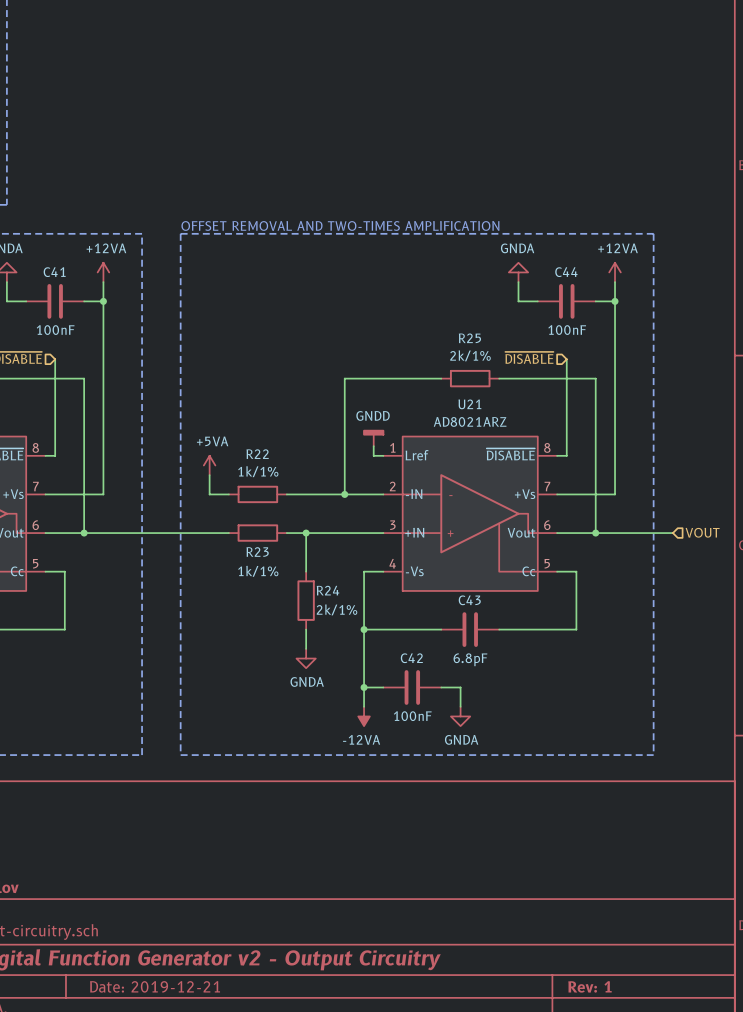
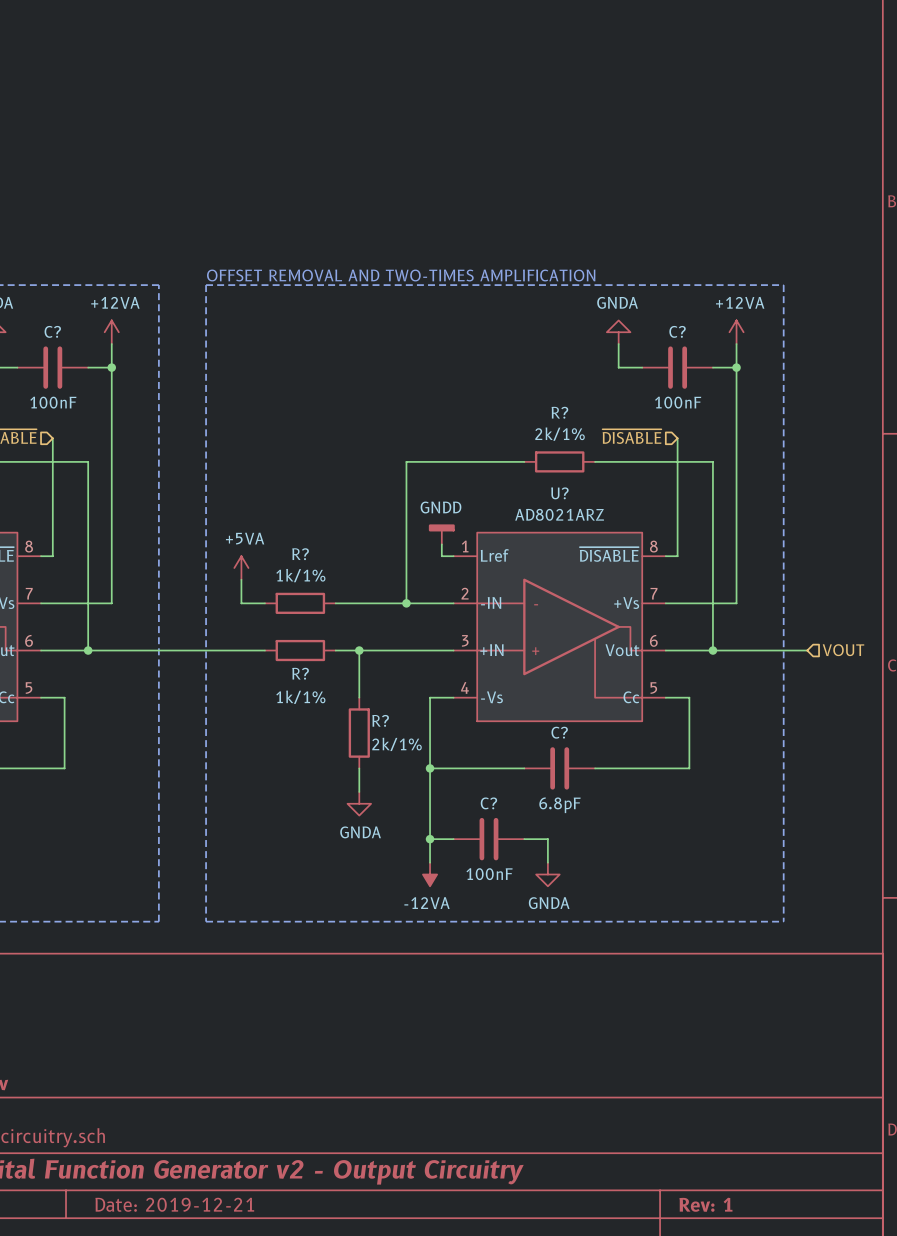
C41 name: C41 (54, 272) -> C? (52, 331)
C44 name: C44 (566, 272) -> C? (677, 331)
R25 name: R25 (469, 338) -> R? (559, 412)
U21 name: U21 (469, 404) -> U? (559, 493)
R22 name: R22 (257, 454) -> R? (300, 554)
R23 name: R23 (257, 552) -> R? (300, 673)
R24 name: R24 (328, 590) -> R? (380, 720)
C43 name: C43 (469, 600) -> C? (559, 732)
C42 name: C42 (411, 658) -> C? (488, 803)

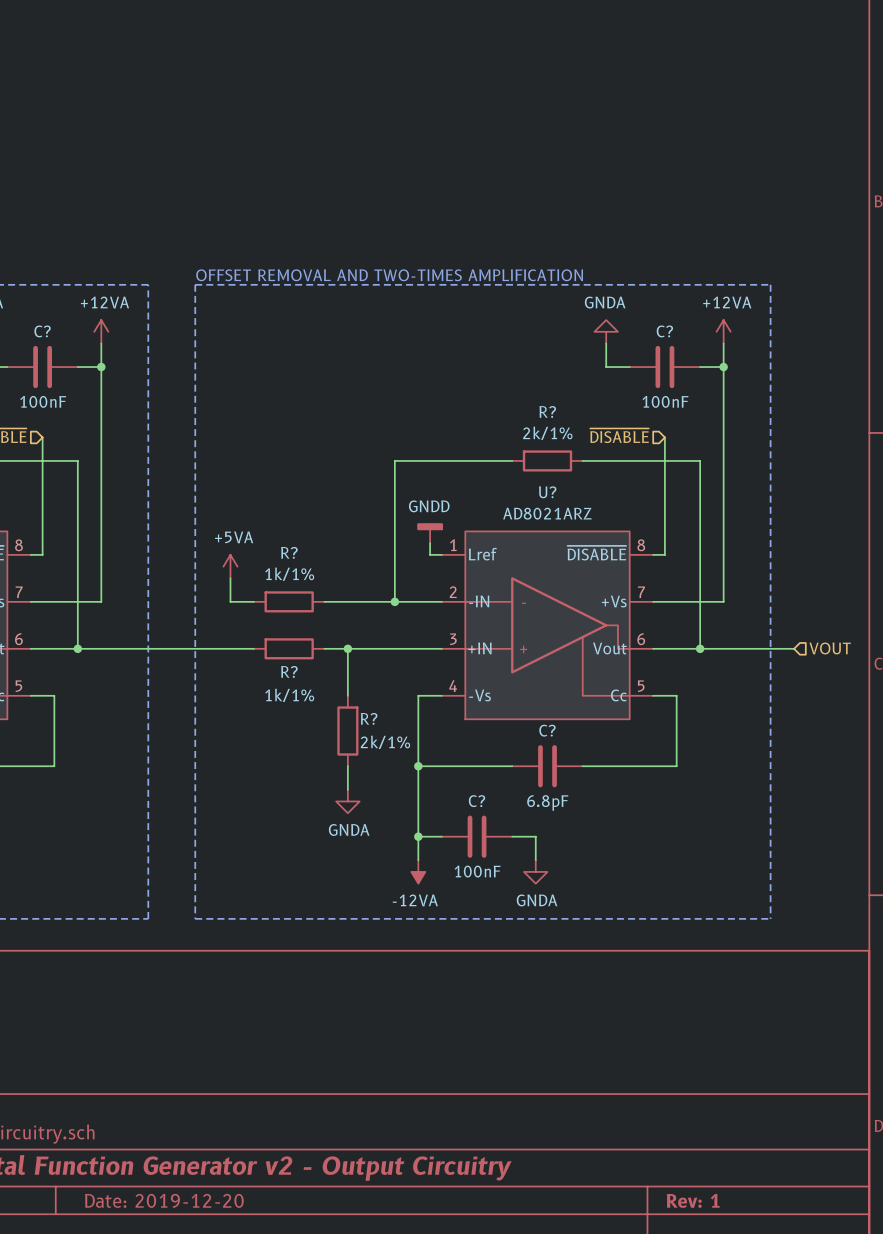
title block: Date: 2019-12-21 (174, 1204) -> Date: 2019-12-20 (164, 1200)

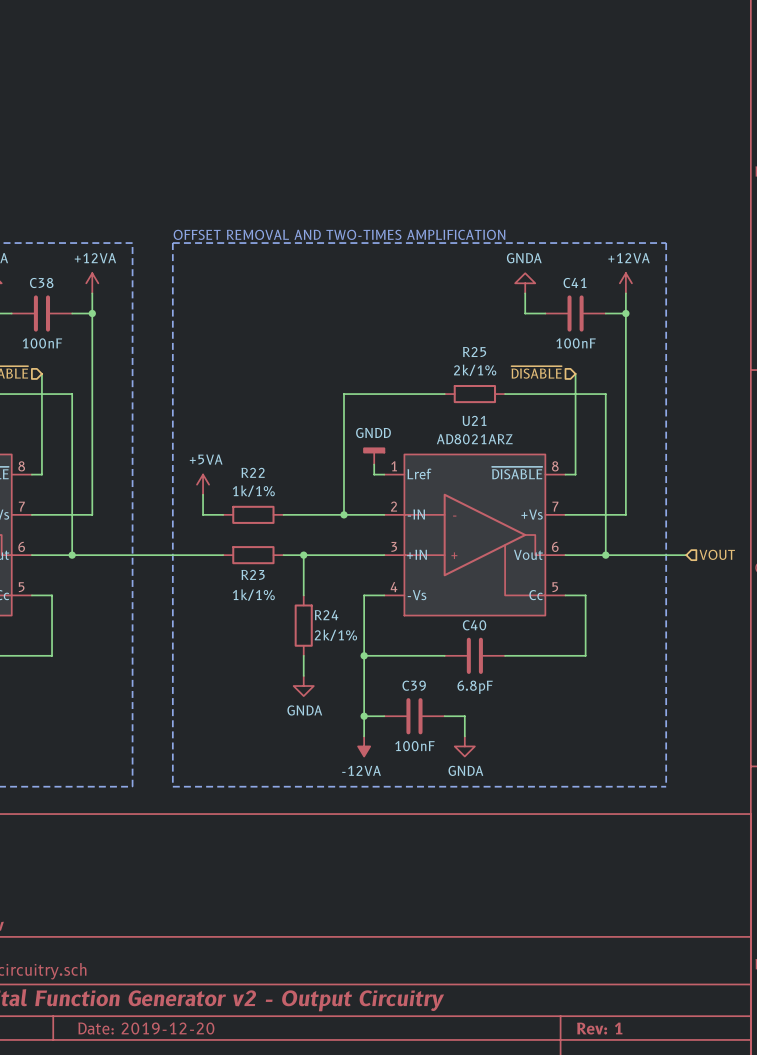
C? name: C? (42, 331) -> C38 (41, 283)
C? name: C? (664, 331) -> C41 (575, 282)
R? name: R? (547, 411) -> R25 (474, 352)
U? name: U? (547, 492) -> U21 (474, 420)
R? name: R? (289, 552) -> R22 (253, 472)
R? name: R? (289, 671) -> R23 (253, 574)
R? name: R? (369, 718) -> R24 (326, 615)
C? name: C? (547, 730) -> C40 (474, 625)
C? name: C? (477, 801) -> C39 (414, 685)

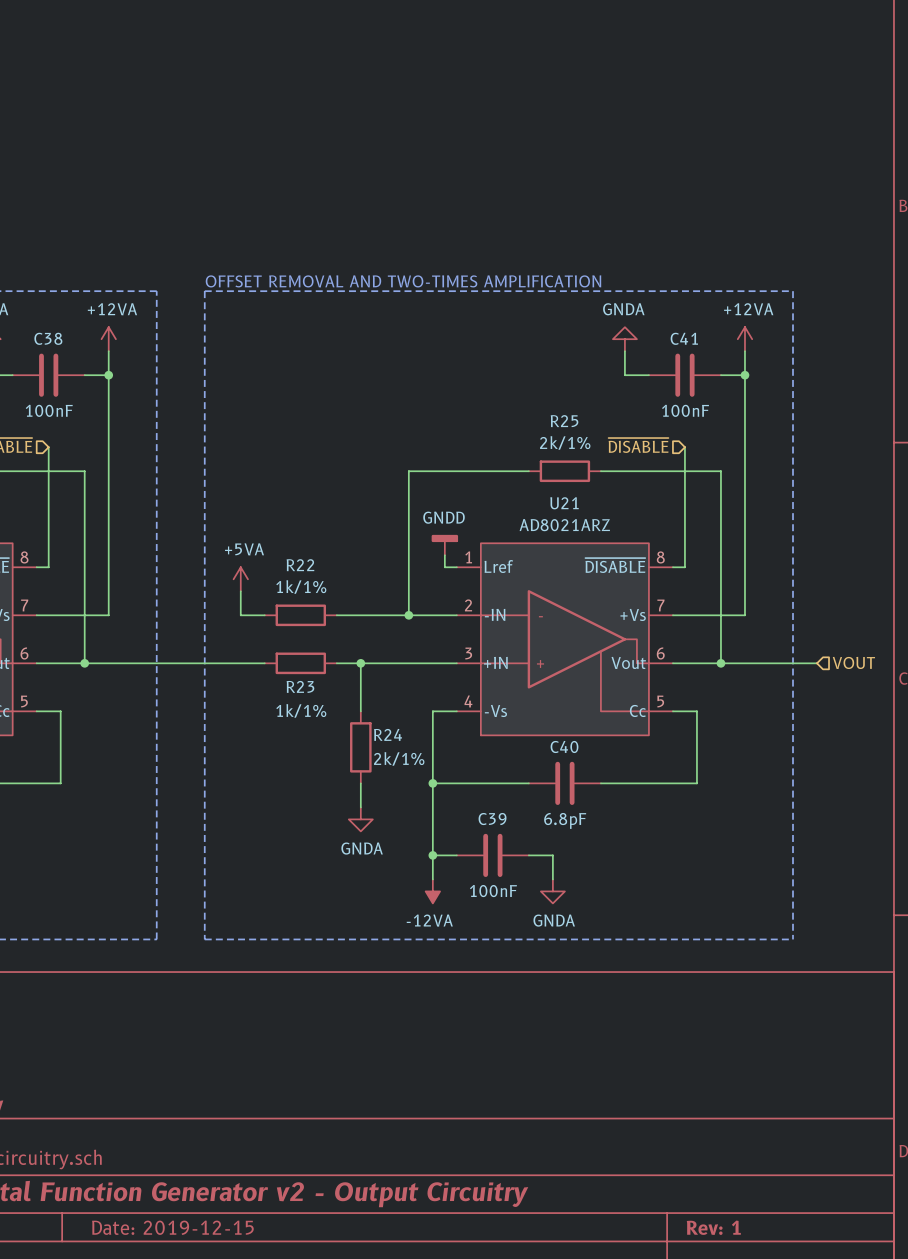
title block: Date: 2019-12-20 (146, 1028) -> Date: 2019-12-15 (172, 1227)

